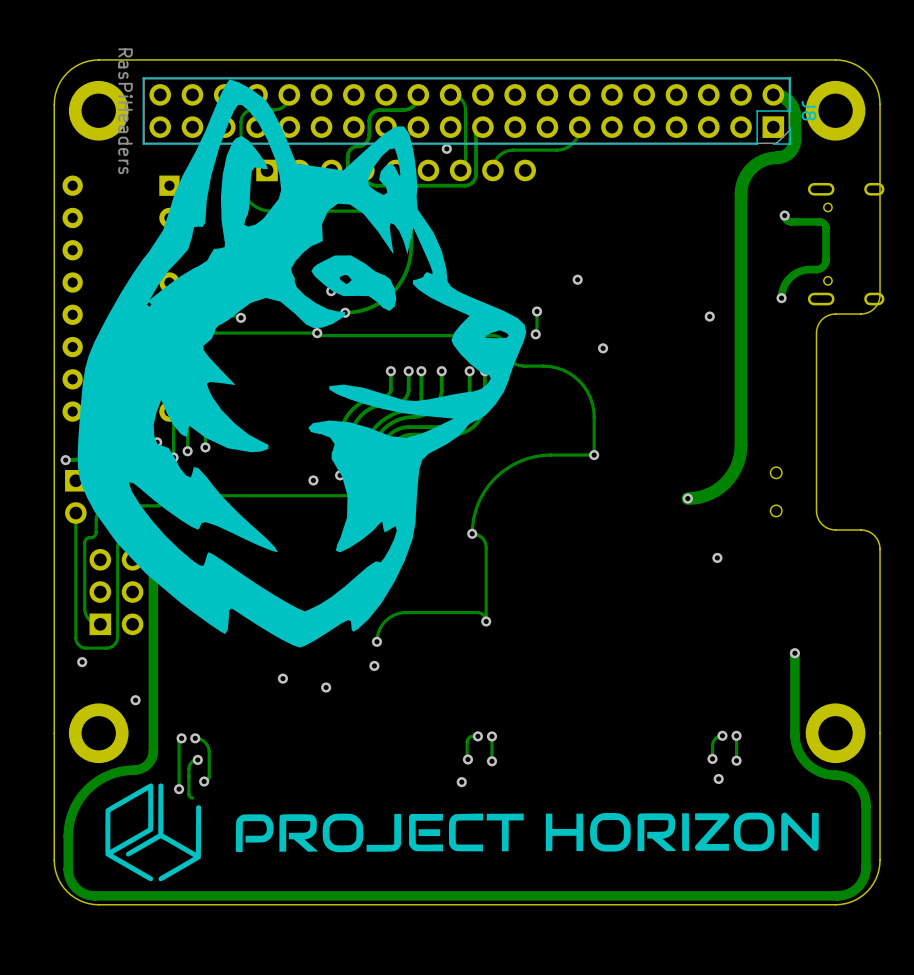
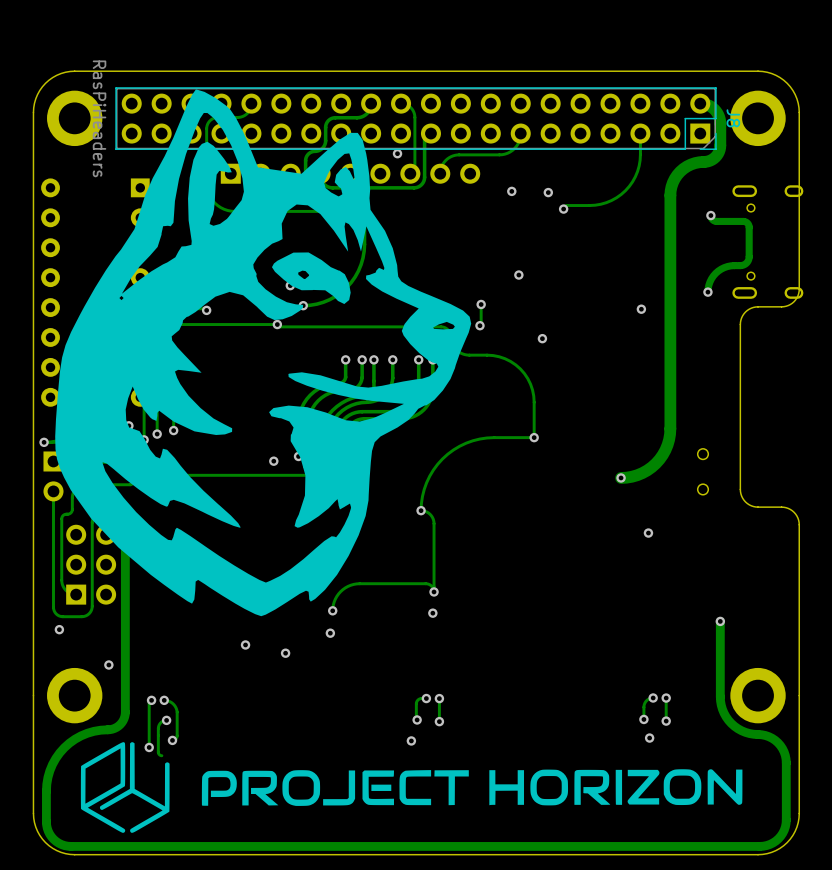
track: none -> (640, 133) (639, 165) (635, 176) (625, 190) (606, 202) (595, 205) (566, 205) (563, 209)
via: none -> (511, 191)
via: none -> (548, 192)
via: none -> (563, 209)
via: none -> (432, 613)

